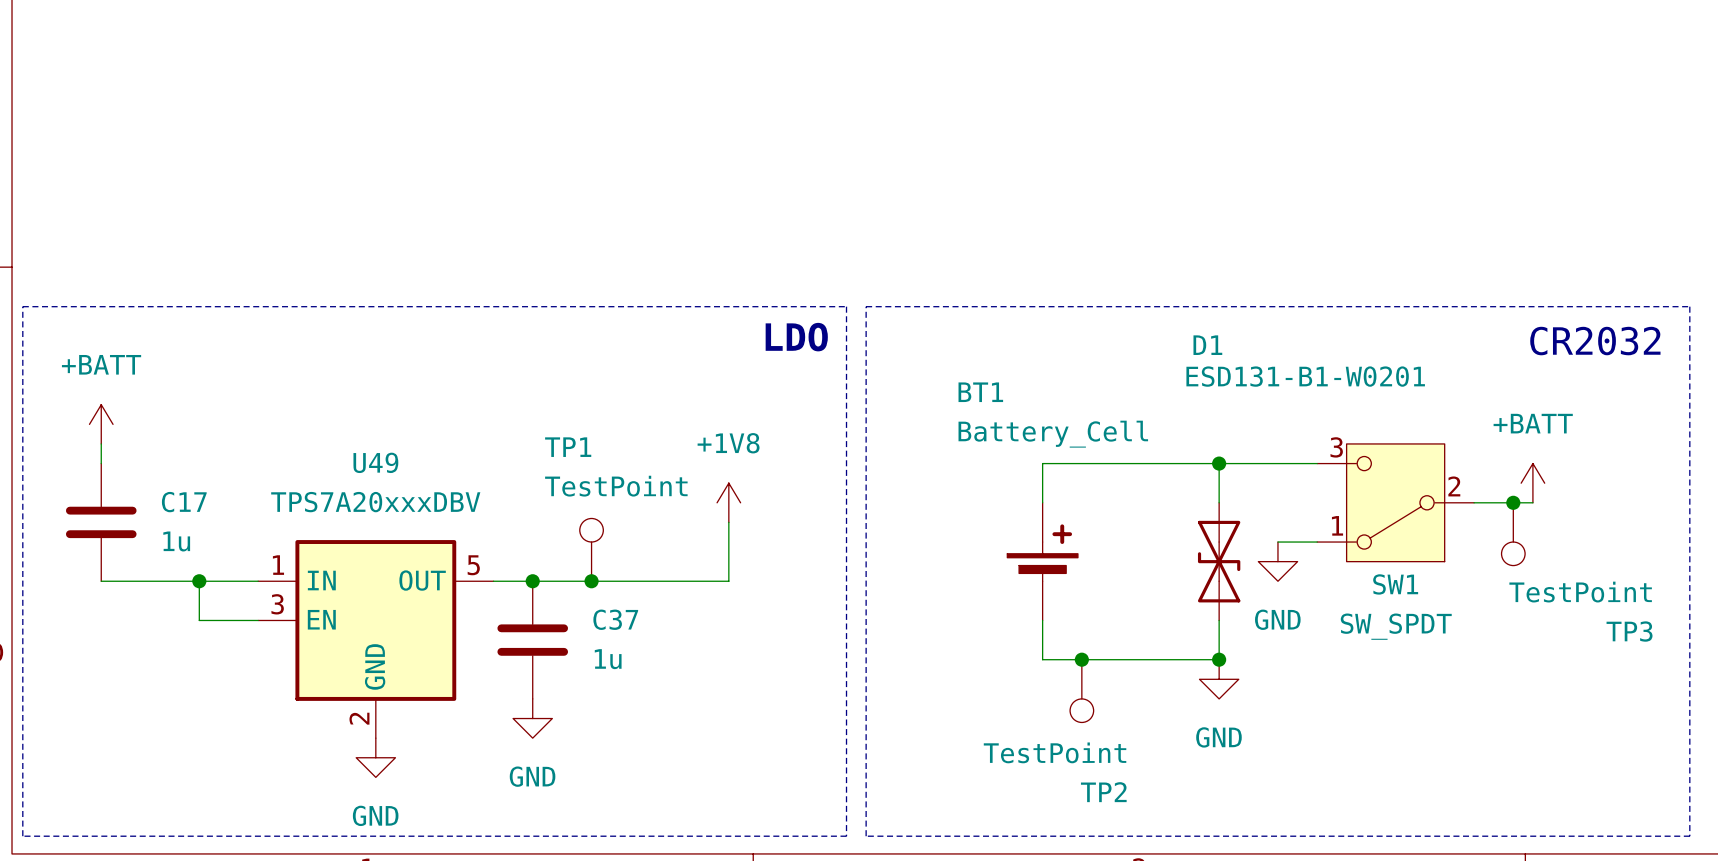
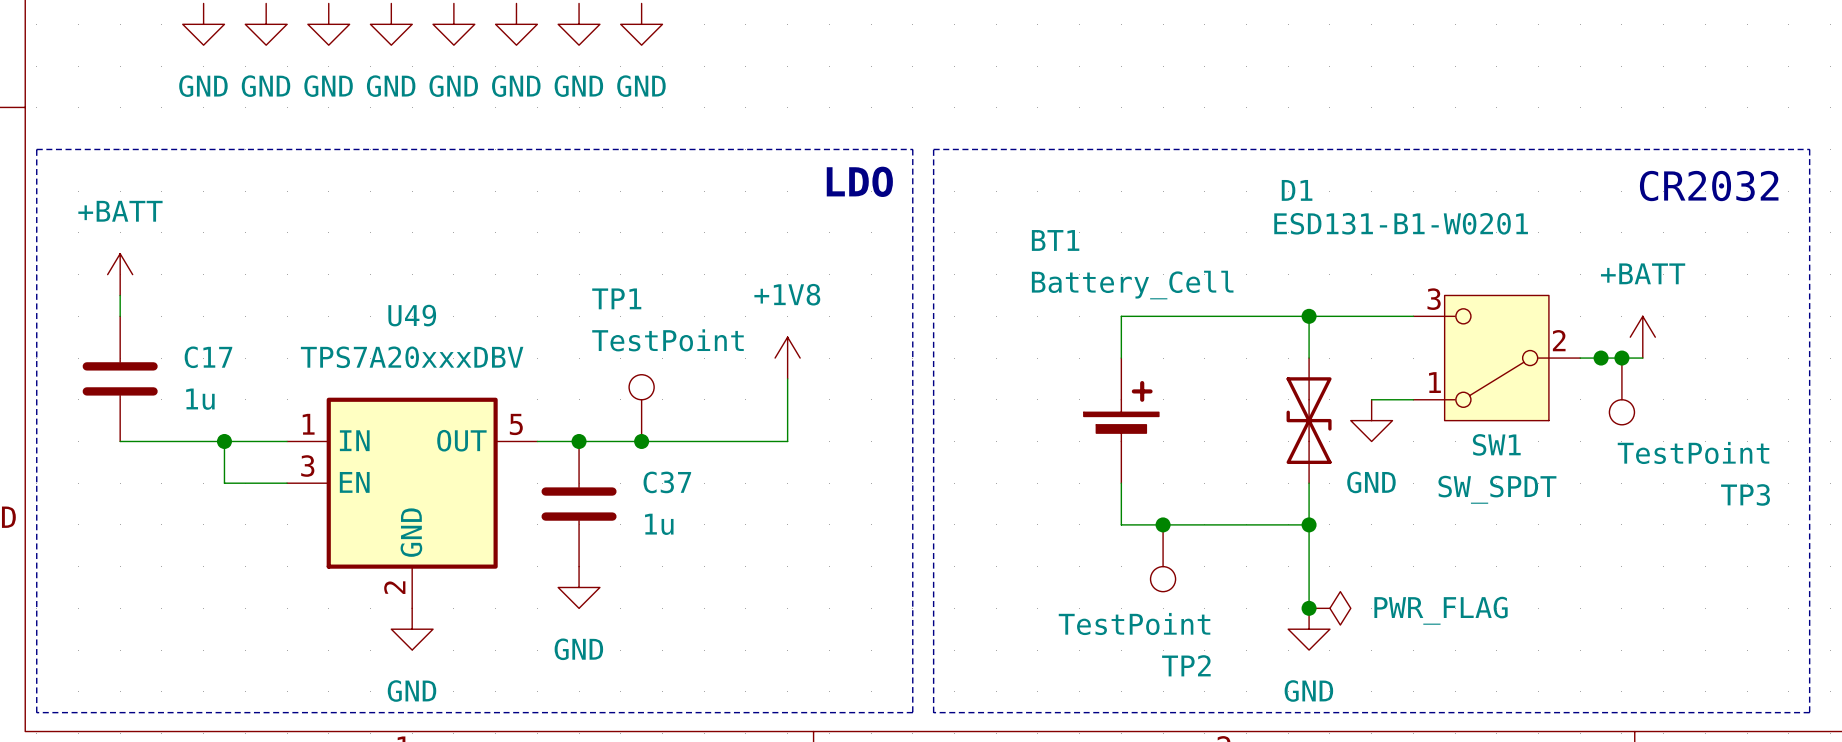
power symbol: none -> GND (203, 24)
power symbol: none -> GND (266, 24)
power symbol: none -> GND (328, 24)
power symbol: none -> GND (391, 24)
power symbol: none -> GND (453, 24)
power symbol: none -> GND (516, 24)
power symbol: none -> GND (579, 24)
power symbol: none -> GND (641, 24)
junction: none -> (1601, 358)
wire: none -> (1309, 524) (1309, 608)
power symbol position: GND (1219, 679) -> GND (1309, 629)
junction: none -> (1309, 608)
power symbol: none -> PWR_FLAG (1329, 608)

